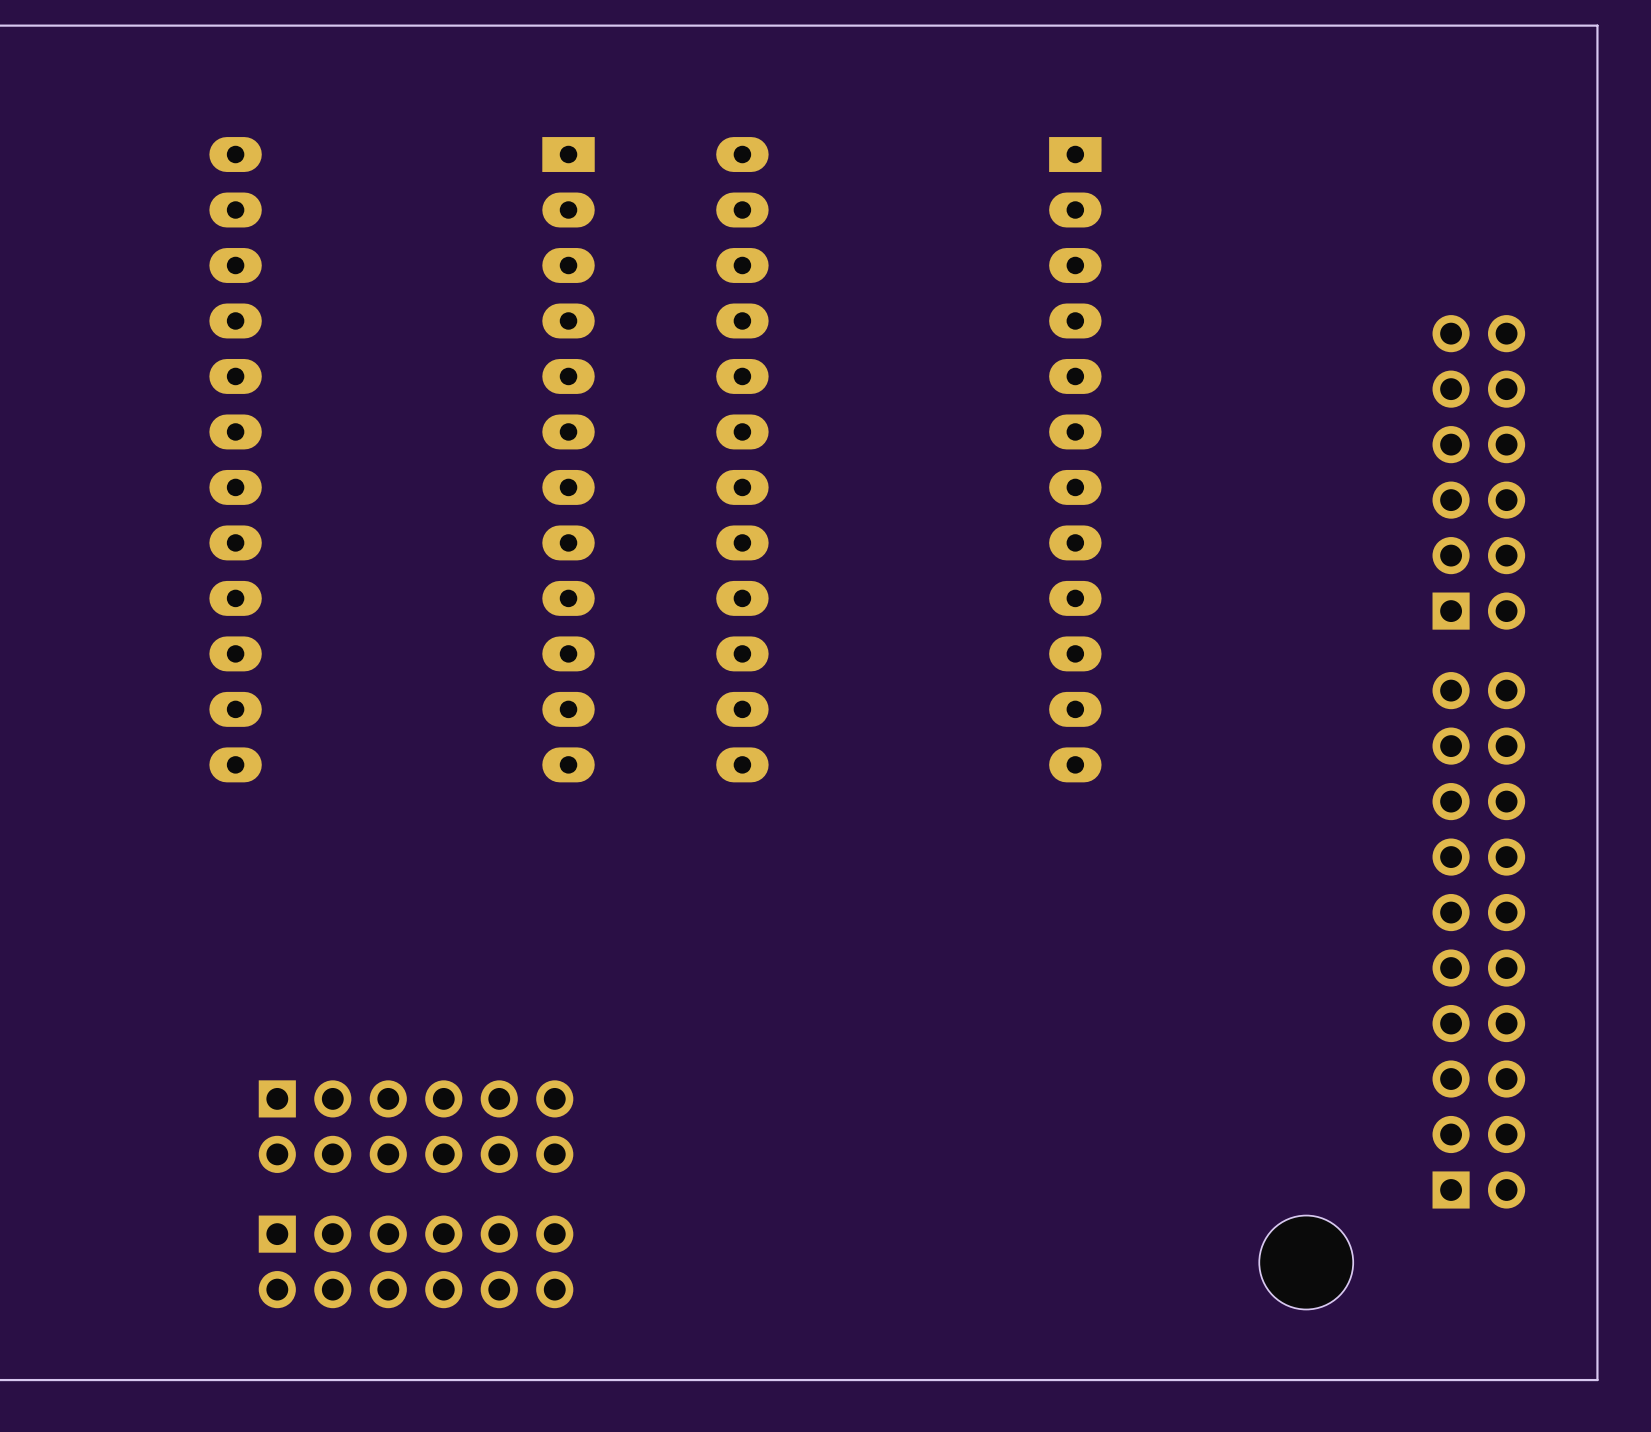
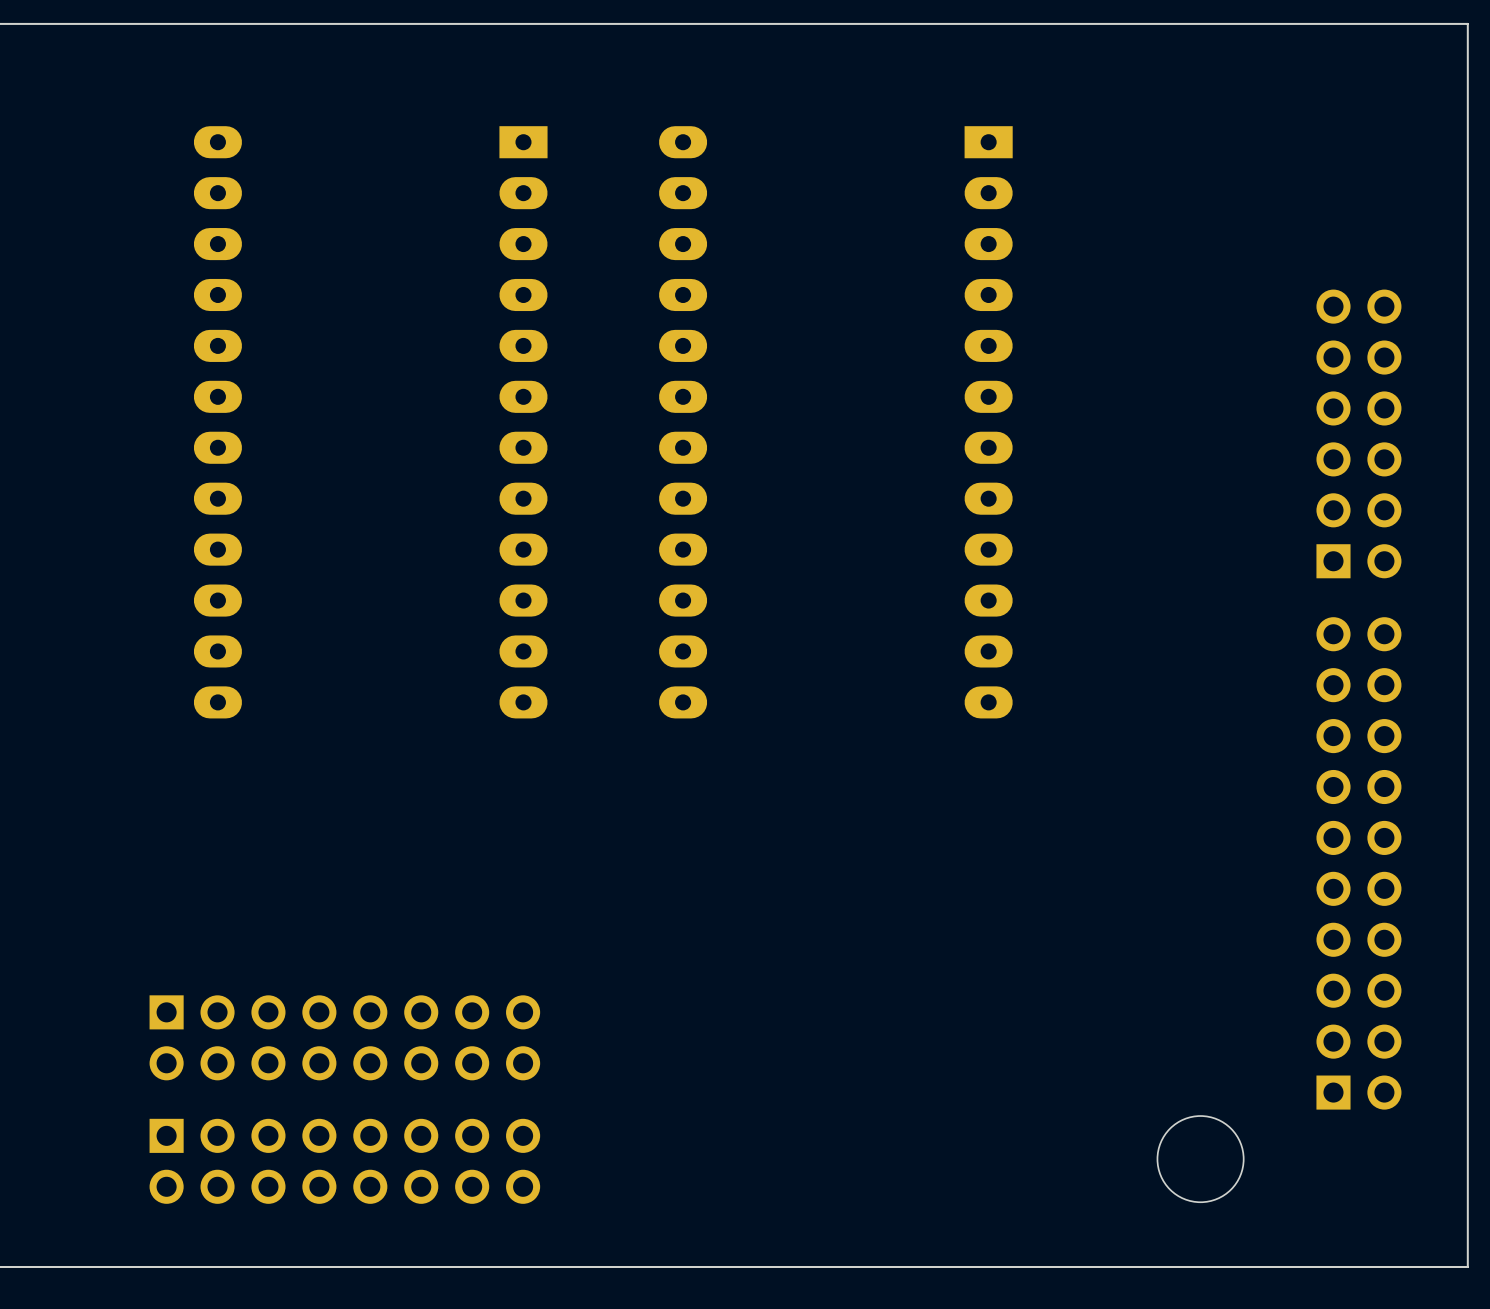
part: (416, 1126) -> none
part: none -> (344, 1037)
part: (416, 1261) -> none
part: none -> (344, 1161)

